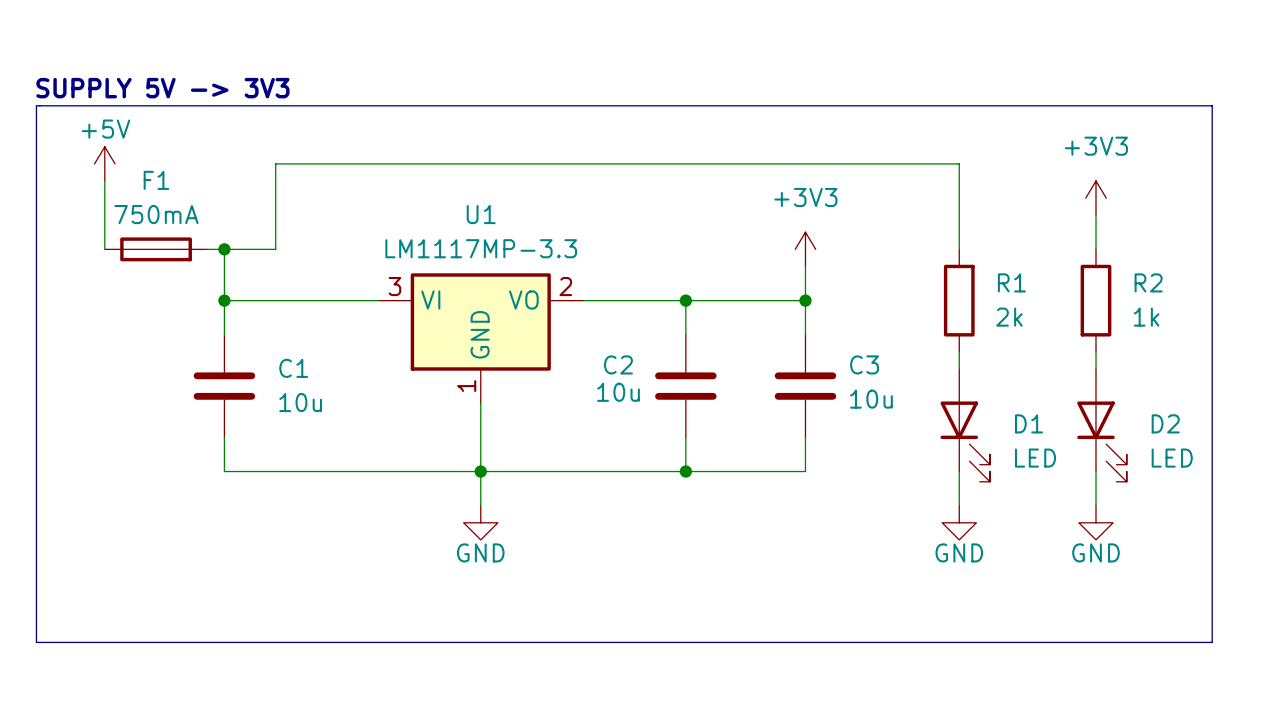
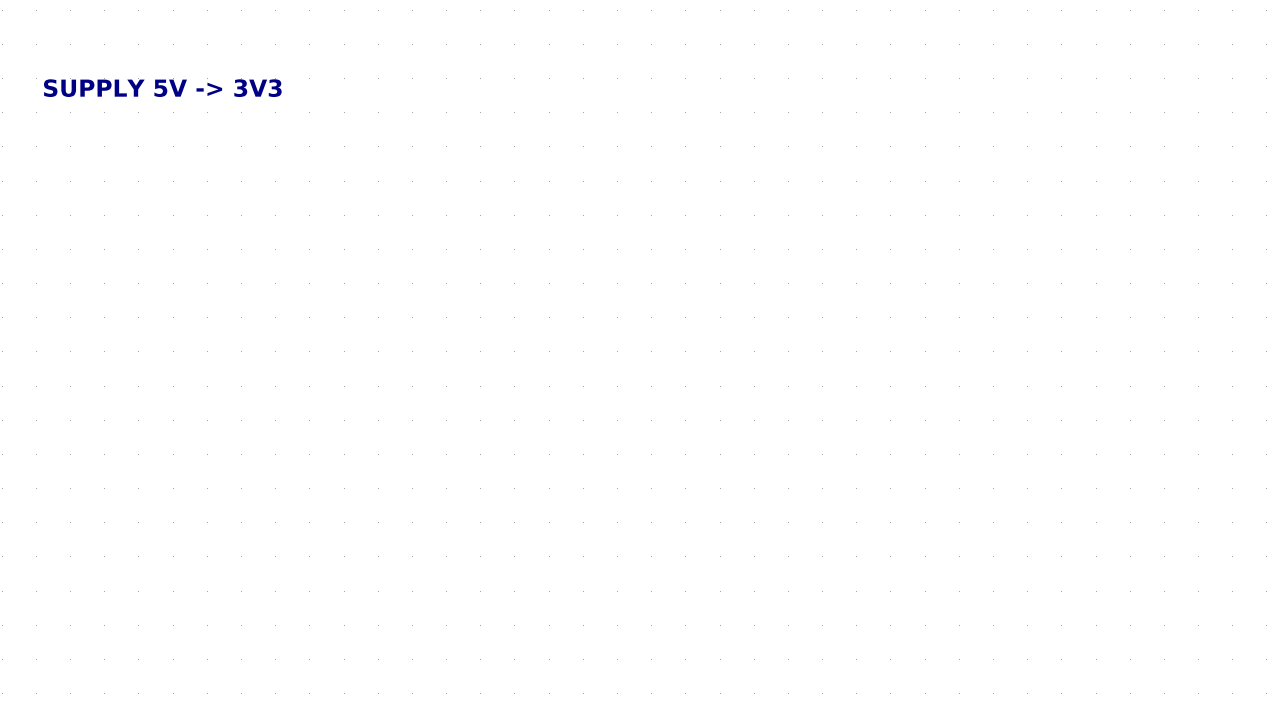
line: (36, 105) (36, 642) (1212, 642) (1212, 105) (36, 105) -> none
power symbol: +5V (104, 163) -> none
wire: (104, 181) (104, 249) -> none
power symbol: +3V3 (1096, 198) -> none
wire: (1096, 215) (1096, 249) -> none
F1: 750mA (156, 249) -> none
wire: (207, 249) (275, 249) (275, 163) (959, 163) (959, 249) -> none
wire: (224, 249) (224, 334) -> none
junction: (224, 249) -> none
power symbol: +3V3 (805, 249) -> none
wire: (805, 266) (805, 334) -> none
wire: (224, 300) (378, 300) -> none
junction: (224, 300) -> none
wire: (583, 300) (805, 300) -> none
wire: (685, 300) (685, 334) -> none
junction: (685, 300) -> none
junction: (805, 300) -> none
R1: 2k (959, 300) -> none
R2: 1k (1096, 300) -> none
U1: LM1117MP-3.3 (480, 338) -> none
wire: (959, 351) (959, 368) -> none
wire: (1096, 351) (1096, 368) -> none
C1: 10u (224, 386) -> none
C2: 10u (685, 386) -> none
C3: 10u (805, 386) -> none
wire: (480, 403) (480, 505) -> none
D1: LED (965, 425) -> none
D2: LED (1101, 425) -> none
wire: (224, 437) (224, 471) (805, 471) (805, 437) -> none
wire: (685, 437) (685, 471) -> none
junction: (480, 471) -> none
junction: (685, 471) -> none
wire: (959, 471) (959, 505) -> none
wire: (1096, 471) (1096, 505) -> none
power symbol: GND (480, 522) -> none
power symbol: GND (959, 522) -> none
power symbol: GND (1096, 522) -> none

